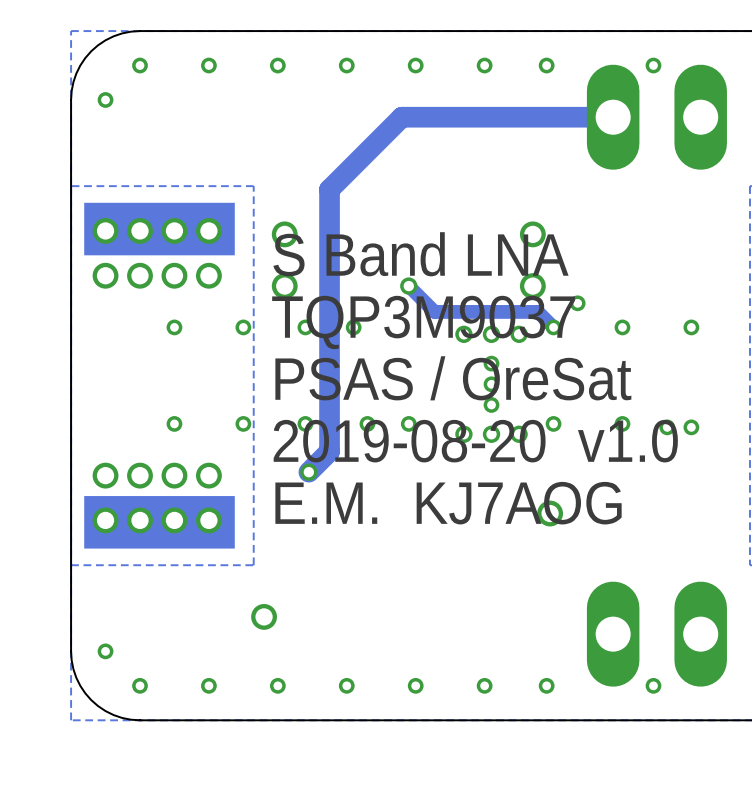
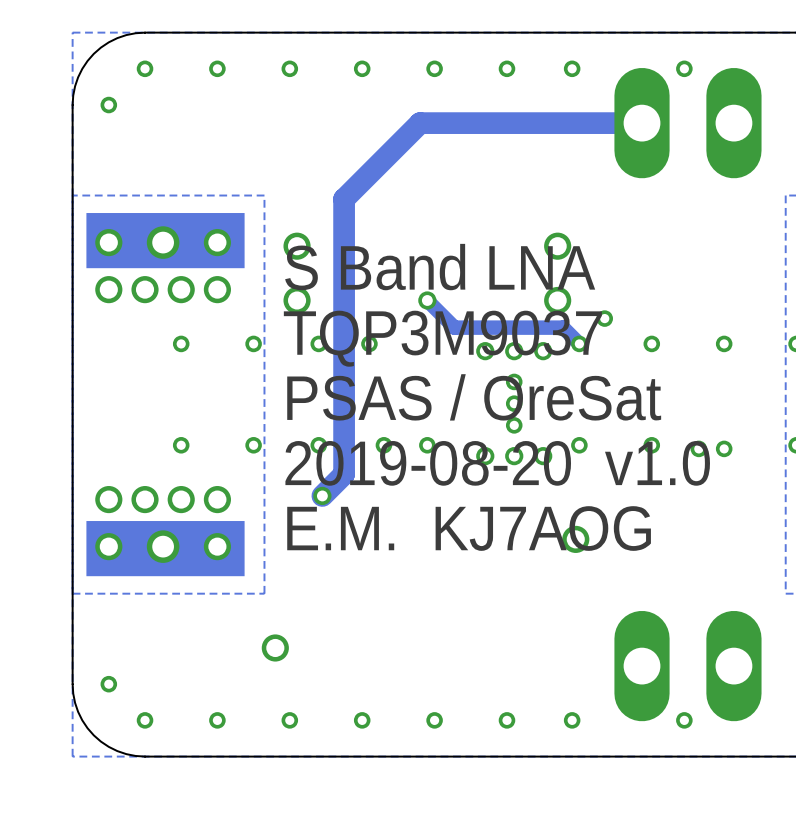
via: (140, 230) -> none
via: none -> (163, 242)
via: (174, 230) -> none
via: (140, 520) -> none
via: none -> (163, 546)
via: (174, 520) -> none

